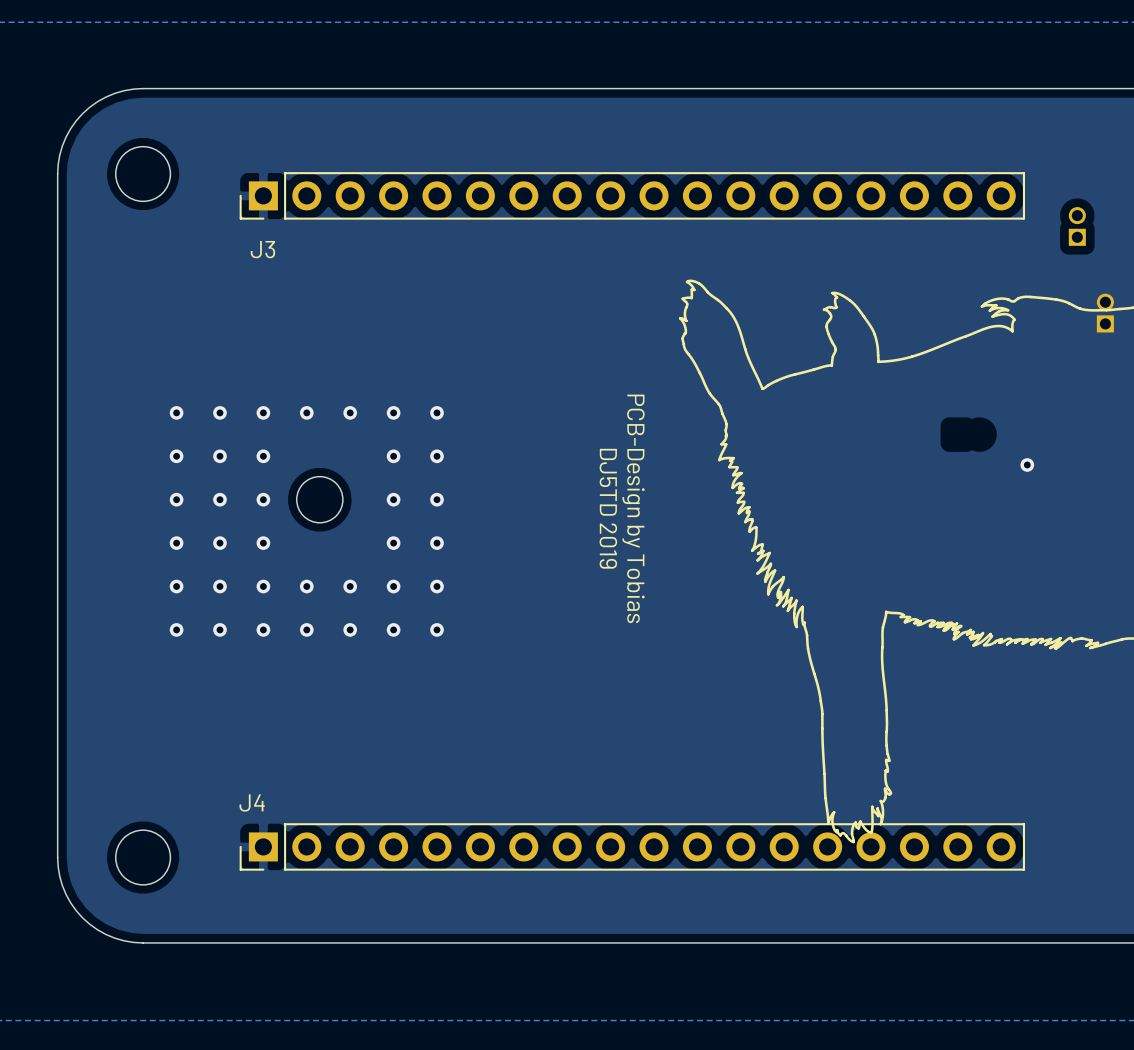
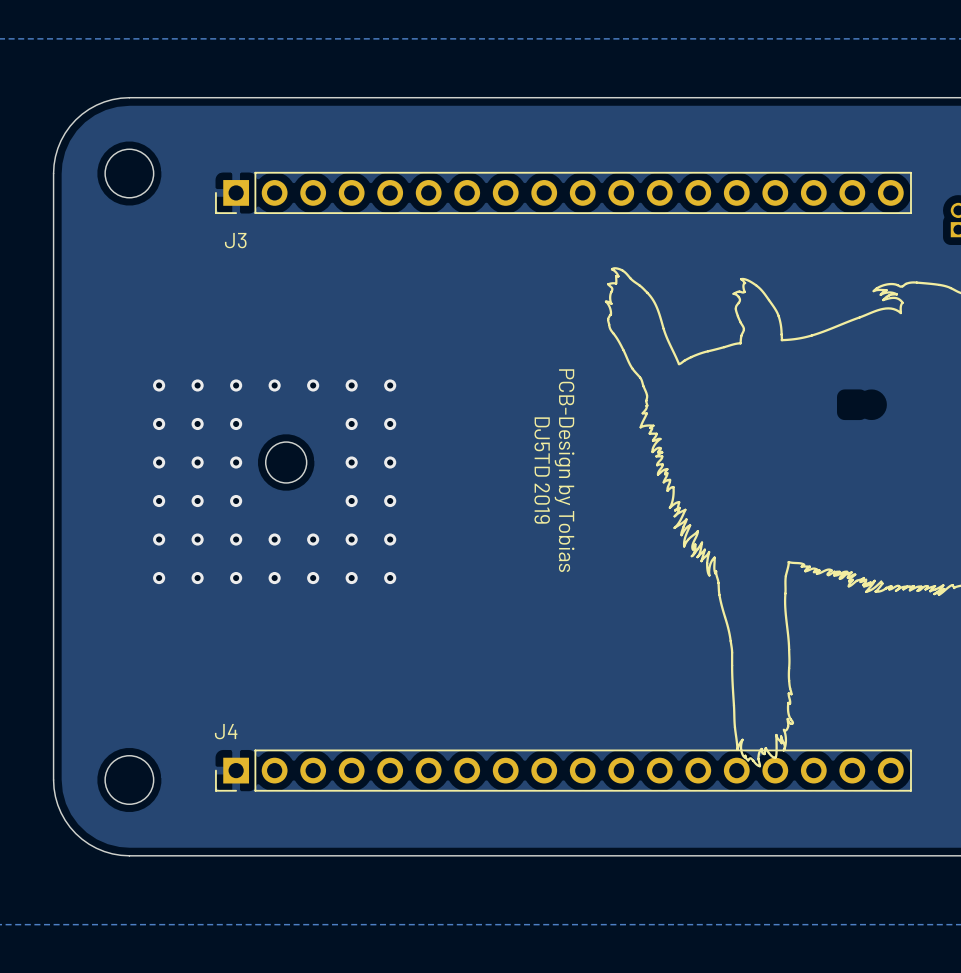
via: (1027, 464) -> none

